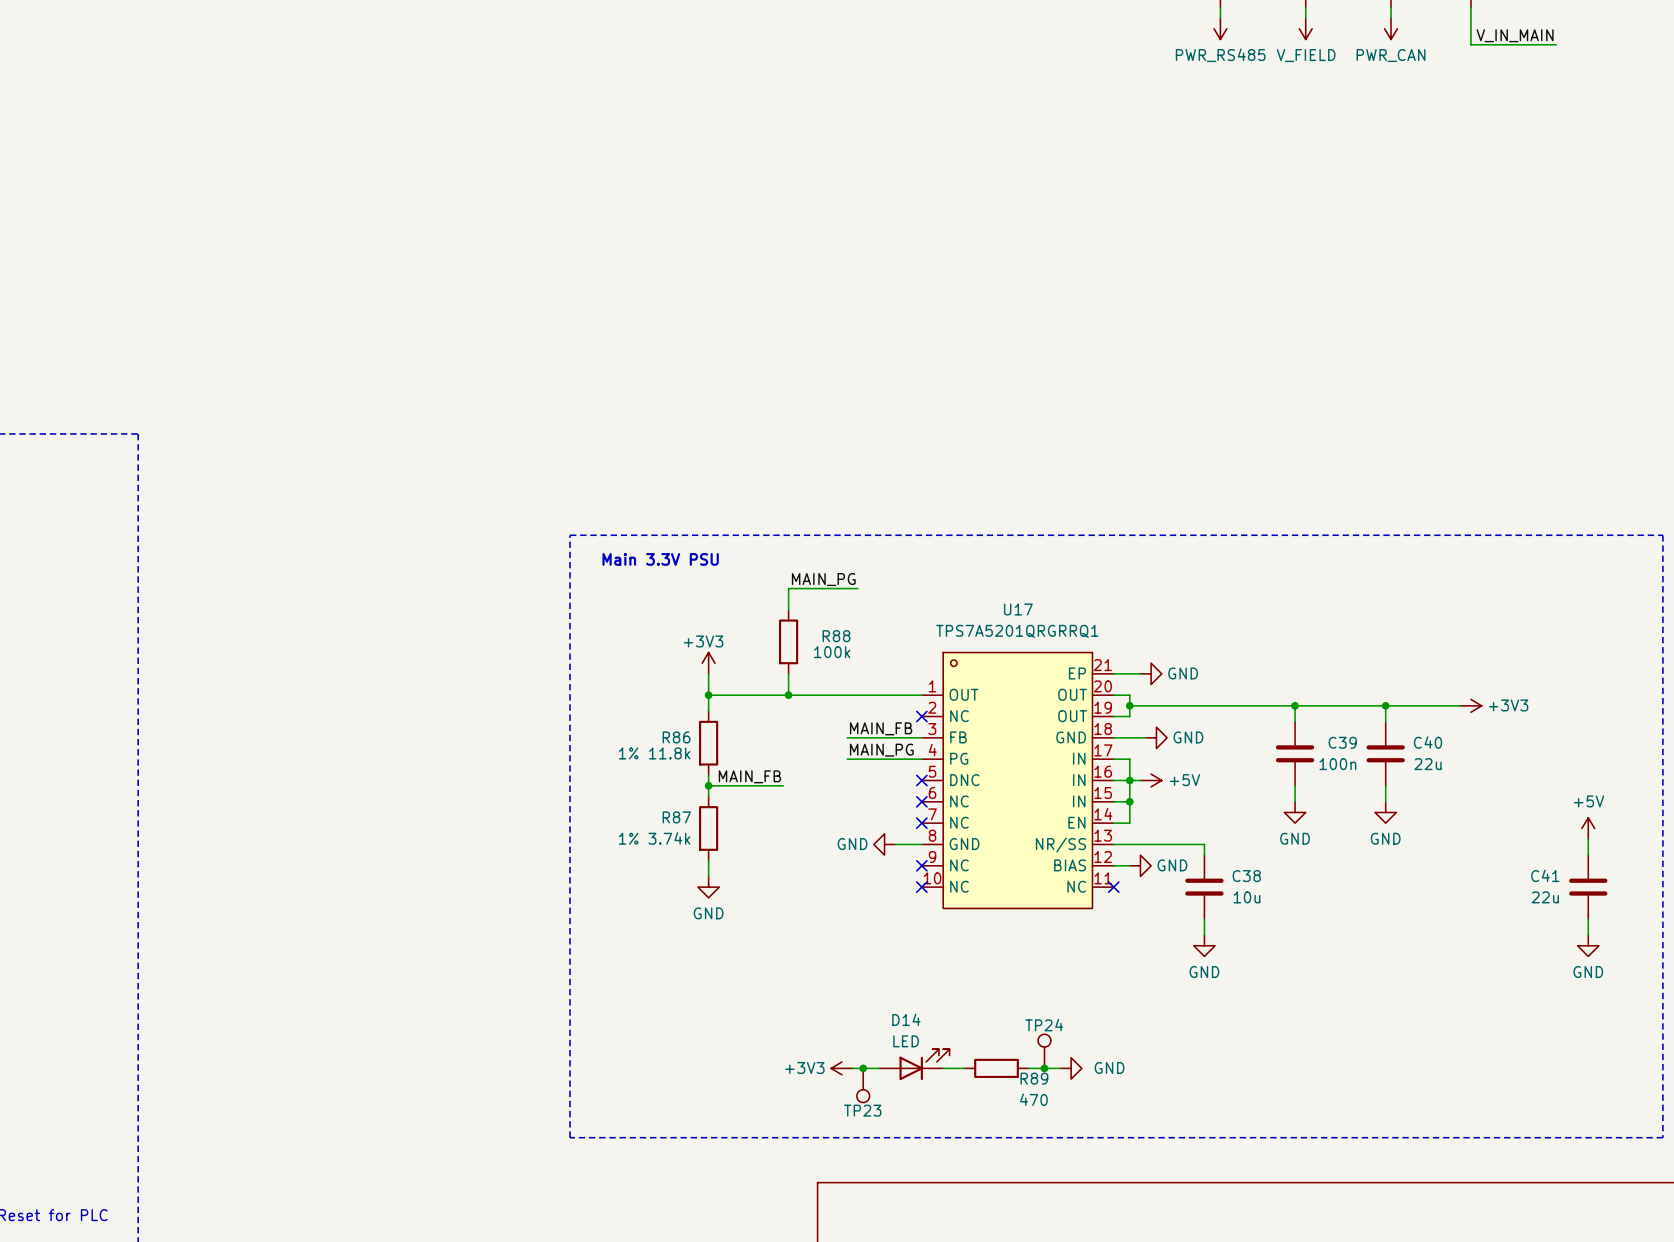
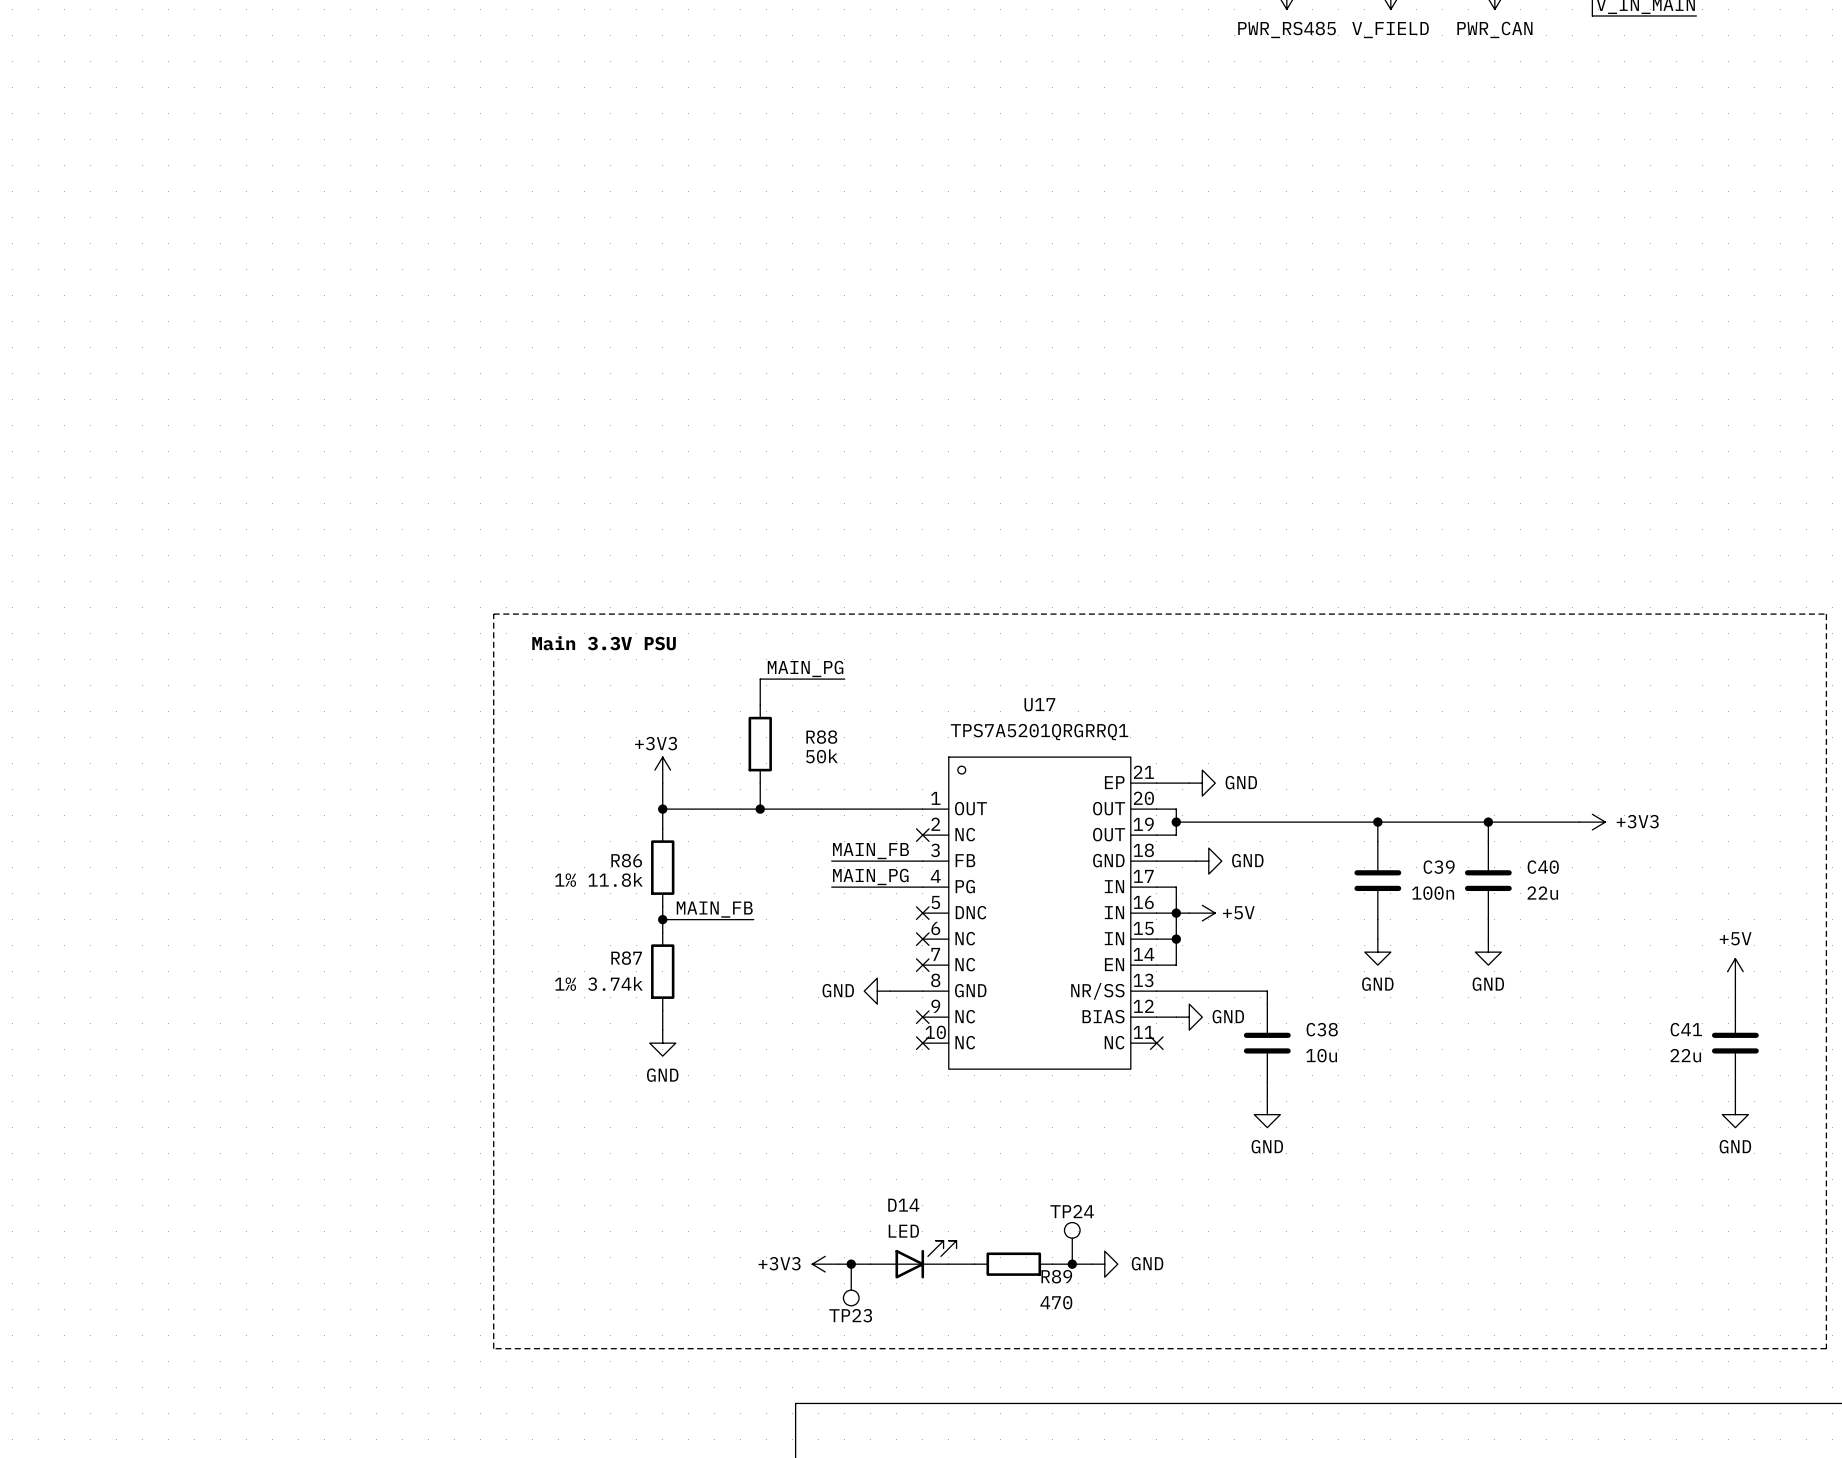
R88 value: 100k (832, 652) -> 50k (821, 756)

